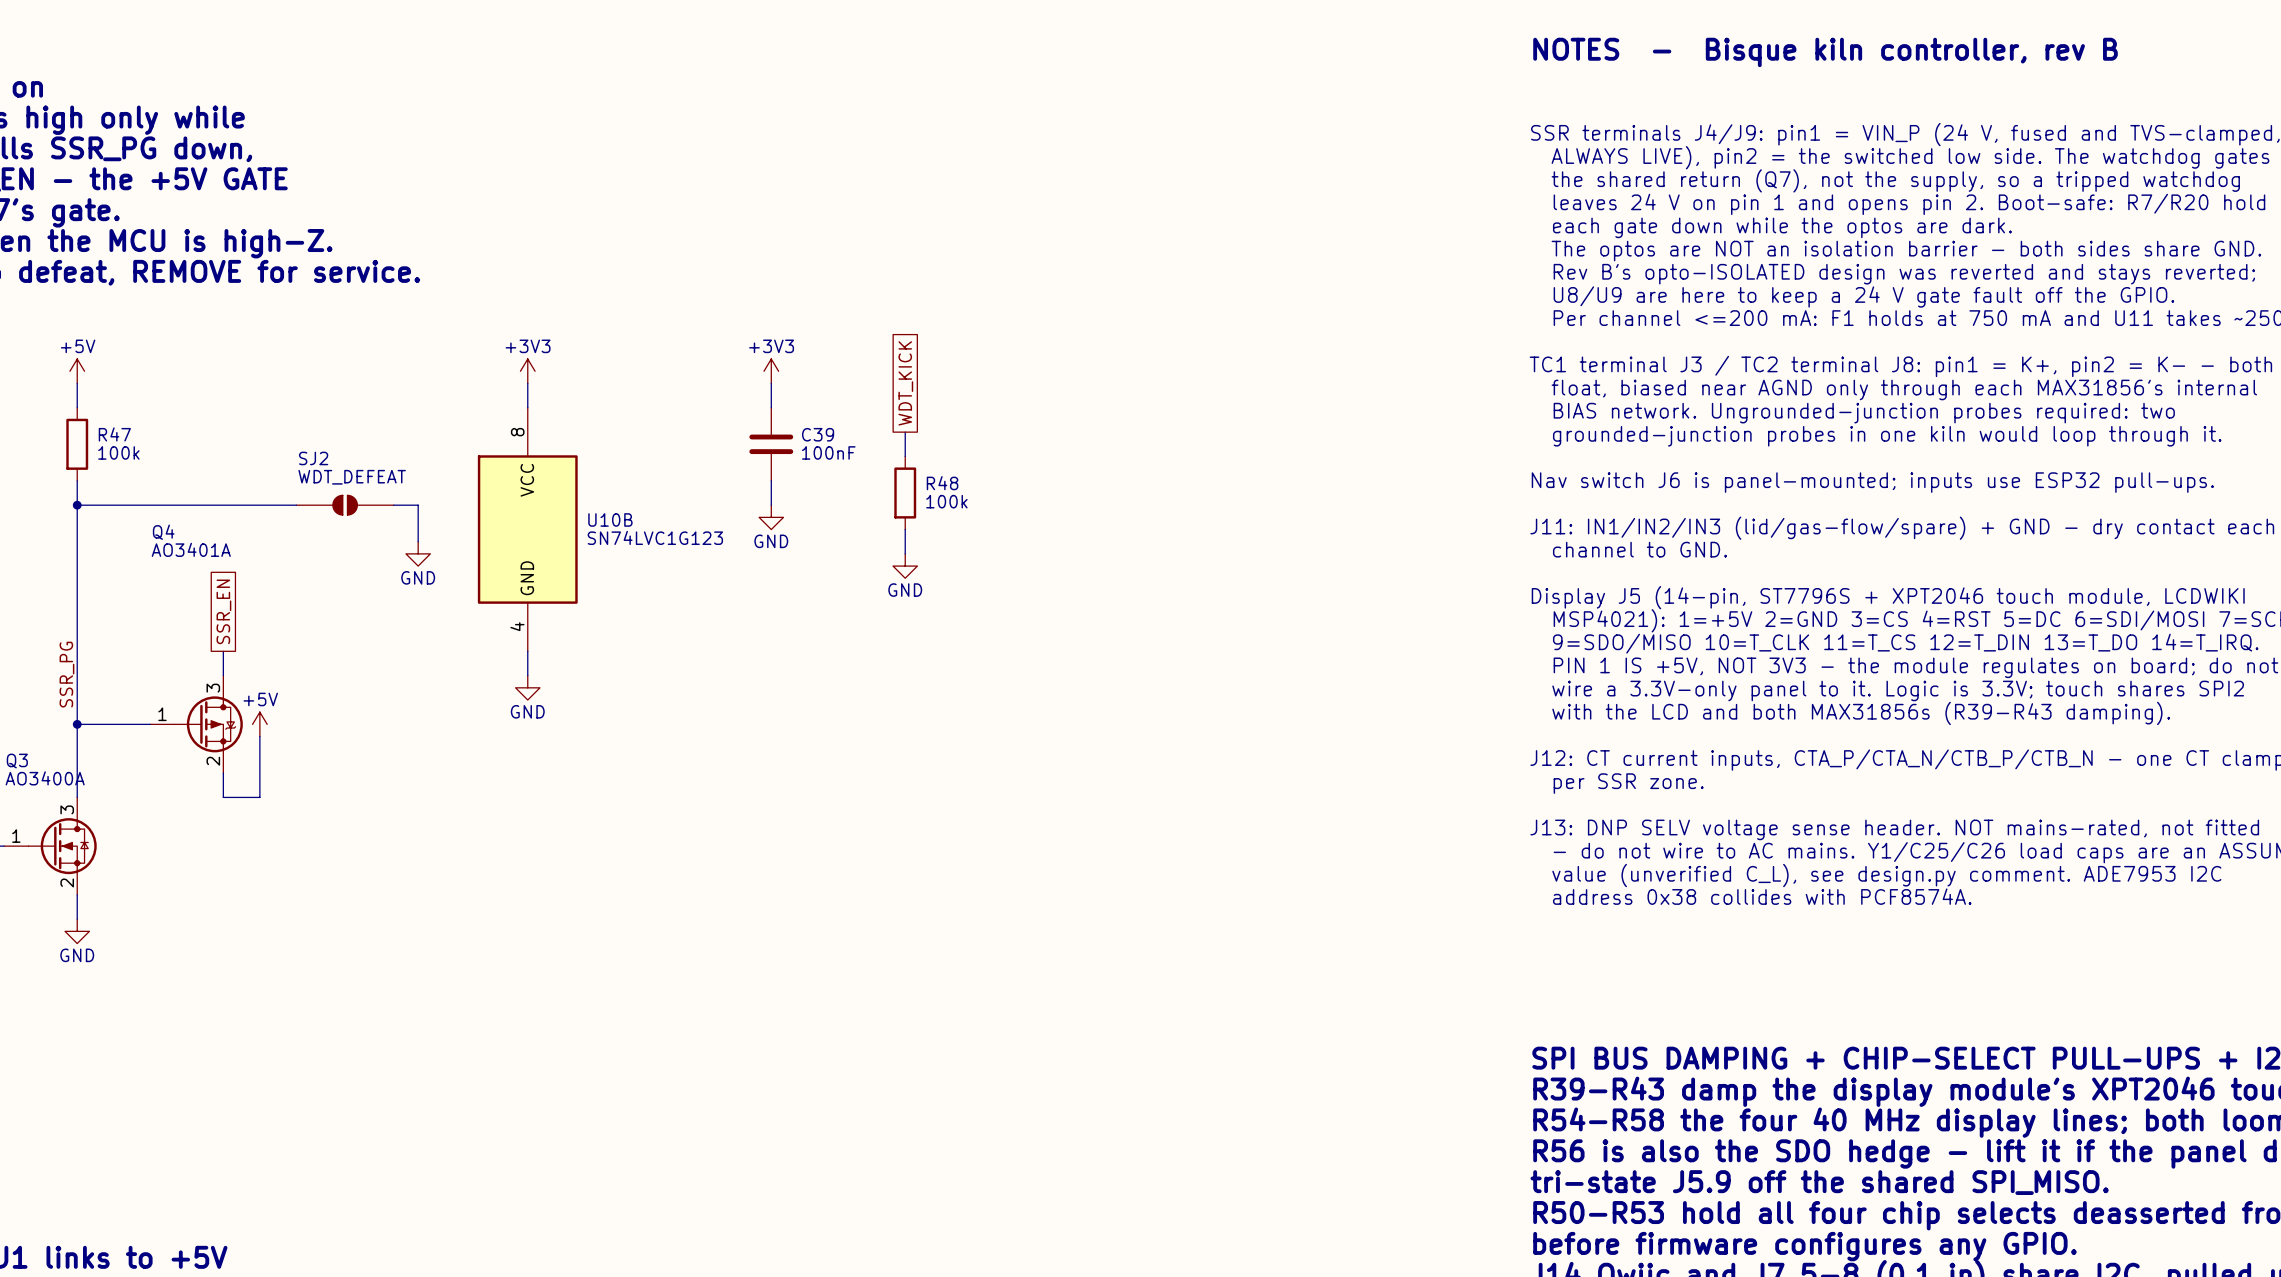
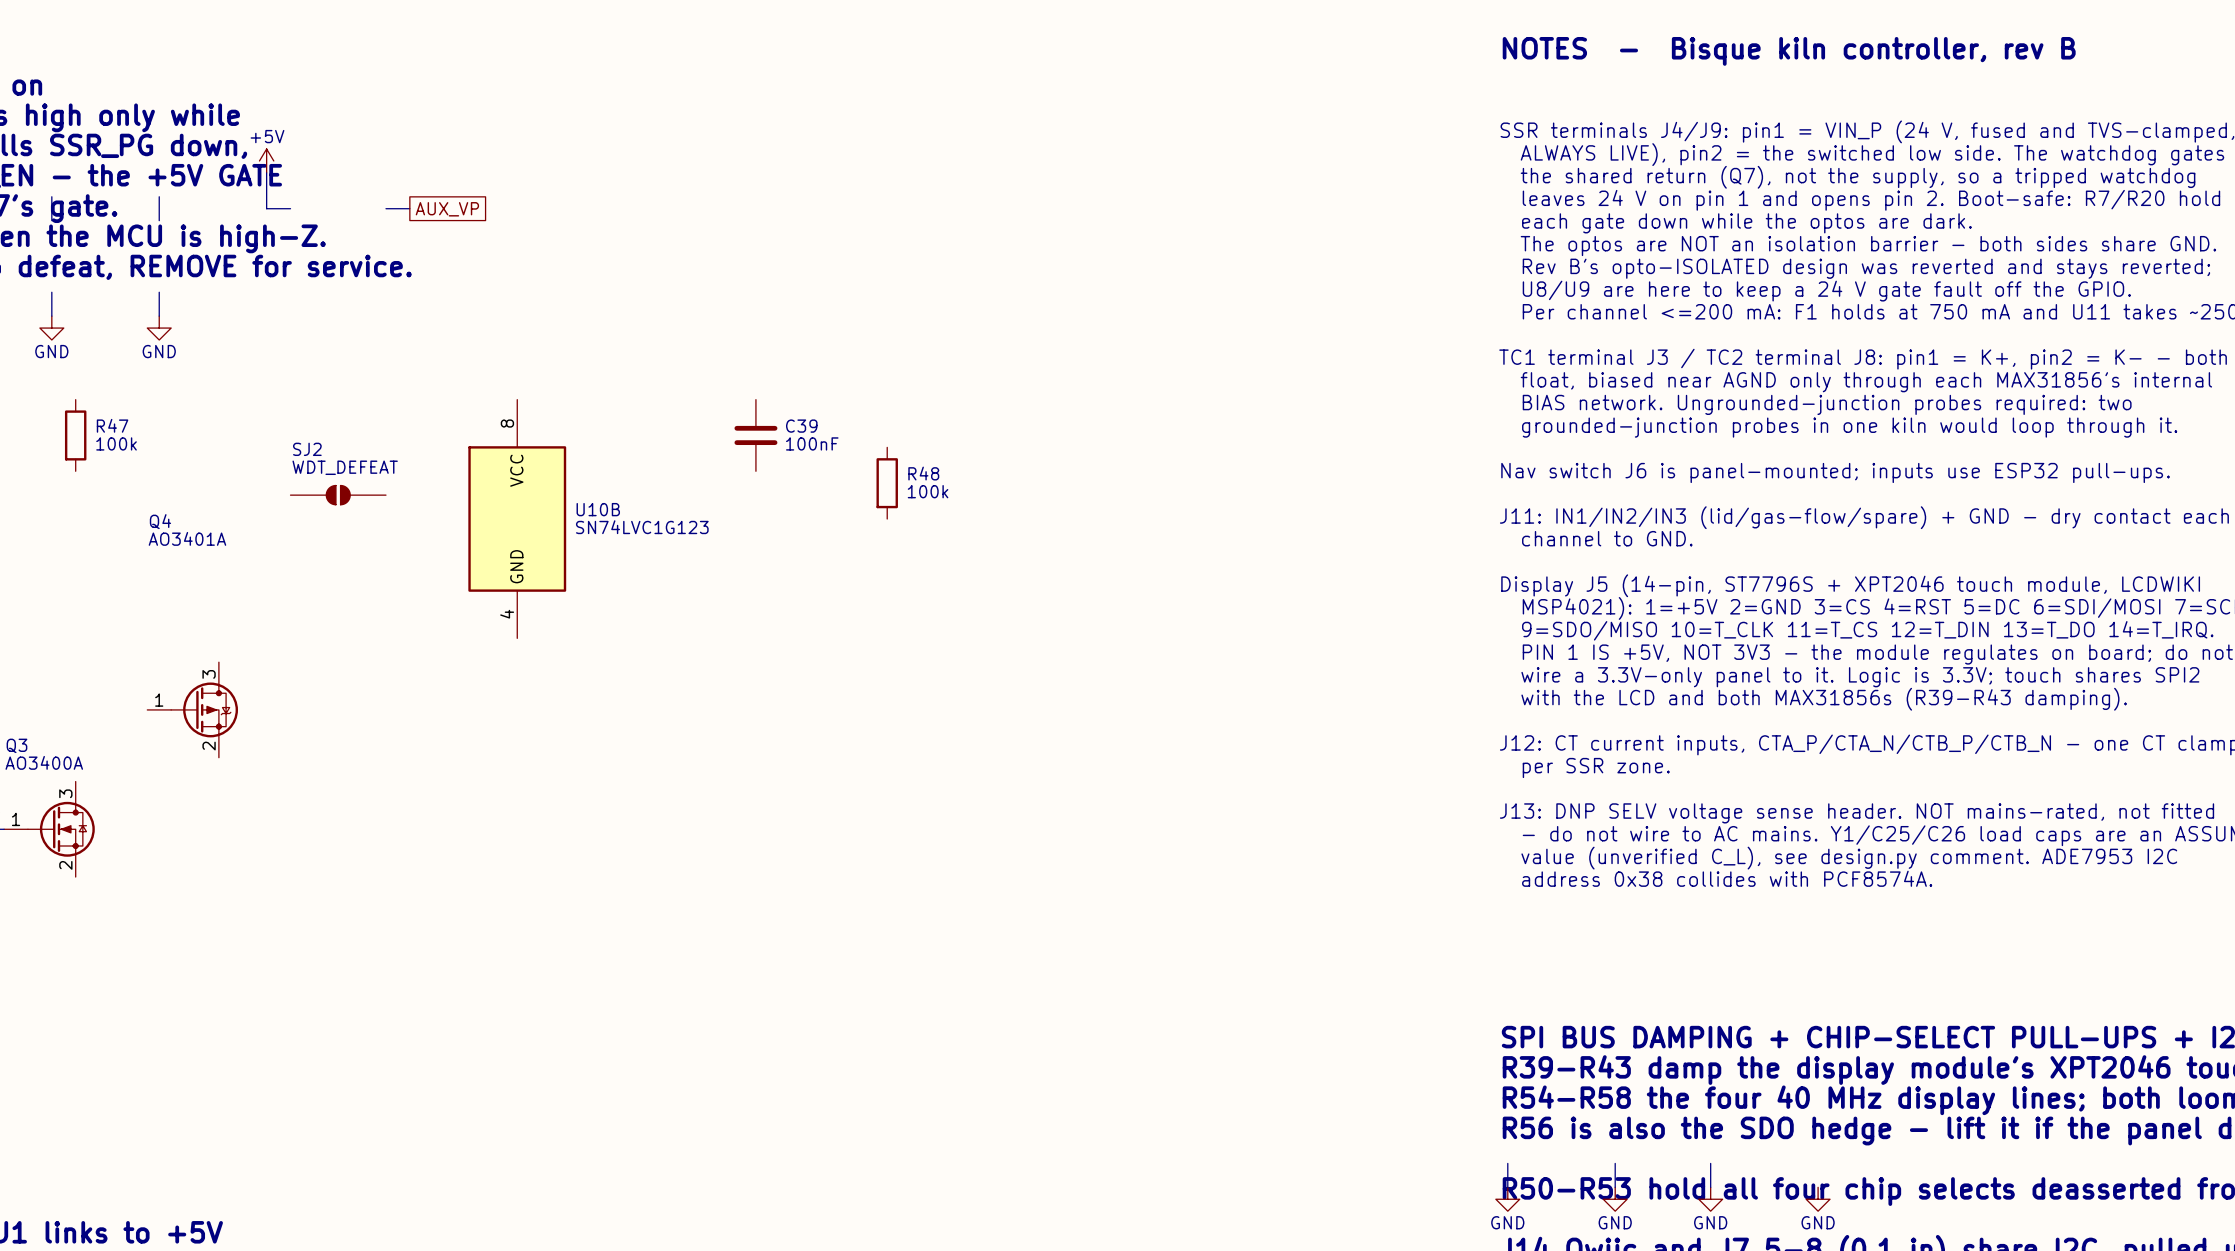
power symbol: none -> +5V (266, 160)
wire: none -> (266, 172) (266, 208) (290, 208)
wire: none -> (51, 196) (51, 220)
wire: none -> (159, 196) (159, 220)
wire: none -> (385, 208) (409, 208)
global label: none -> AUX_VP (447, 209)
wire: none -> (159, 292) (159, 316)
power symbol: none -> GND (51, 328)
power symbol: none -> GND (159, 328)
power symbol: +5V (77, 371) -> none
power symbol: +3V3 (527, 371) -> none
power symbol: +3V3 (771, 371) -> none
wire: (77, 383) (77, 407) -> (51, 292) (51, 316)
wire: (527, 383) (527, 407) -> none
wire: (771, 383) (771, 407) -> none
global label: WDT_KICK (905, 383) -> none
wire: (905, 432) (905, 456) -> none
wire: (77, 480) (77, 797) -> none
wire: (771, 480) (771, 505) -> none
wire: (77, 505) (296, 505) -> none
junction: (77, 505) -> none
wire: (393, 505) (418, 505) (418, 541) -> none
power symbol: GND (771, 517) -> none
wire: (905, 529) (905, 553) -> none
power symbol: GND (418, 553) -> none
power symbol: GND (905, 566) -> none
global label: SSR_EN (223, 611) -> none
wire: (223, 651) (223, 675) -> none
wire: (527, 651) (527, 675) -> none
label: SSR_PG (66, 674) -> none
power symbol: GND (527, 687) -> none
wire: (77, 724) (150, 724) -> none
junction: (77, 724) -> none
power symbol: +5V (259, 724) -> none
wire: (259, 736) (259, 797) (223, 797) (223, 773) -> none
wire: (77, 894) (77, 919) -> none
power symbol: GND (77, 931) -> none
text: tri-state J5.9 off the shared SPI_MISO. (1819, 1182) -> none
wire: none -> (1507, 1163) (1507, 1187)
wire: none -> (1615, 1163) (1615, 1187)
wire: none -> (1710, 1163) (1710, 1187)
power symbol: none -> GND (1507, 1199)
power symbol: none -> GND (1615, 1199)
power symbol: none -> GND (1710, 1199)
power symbol: none -> GND (1818, 1199)
text: before firmware configures any GPIO. (1804, 1246) -> none

